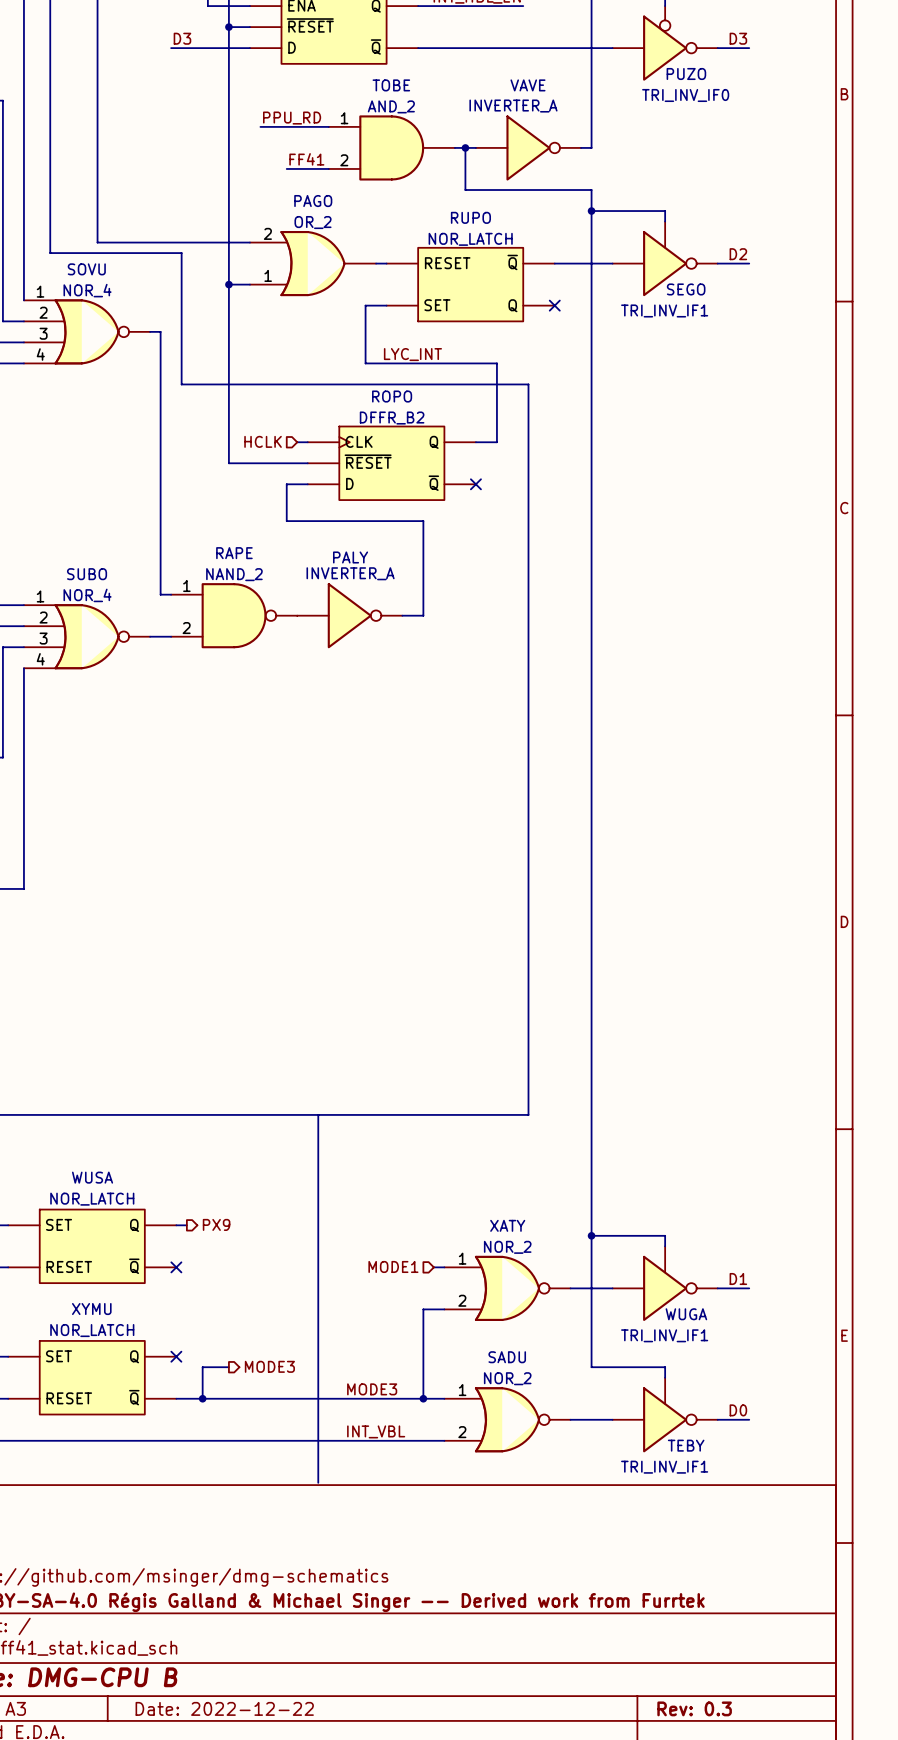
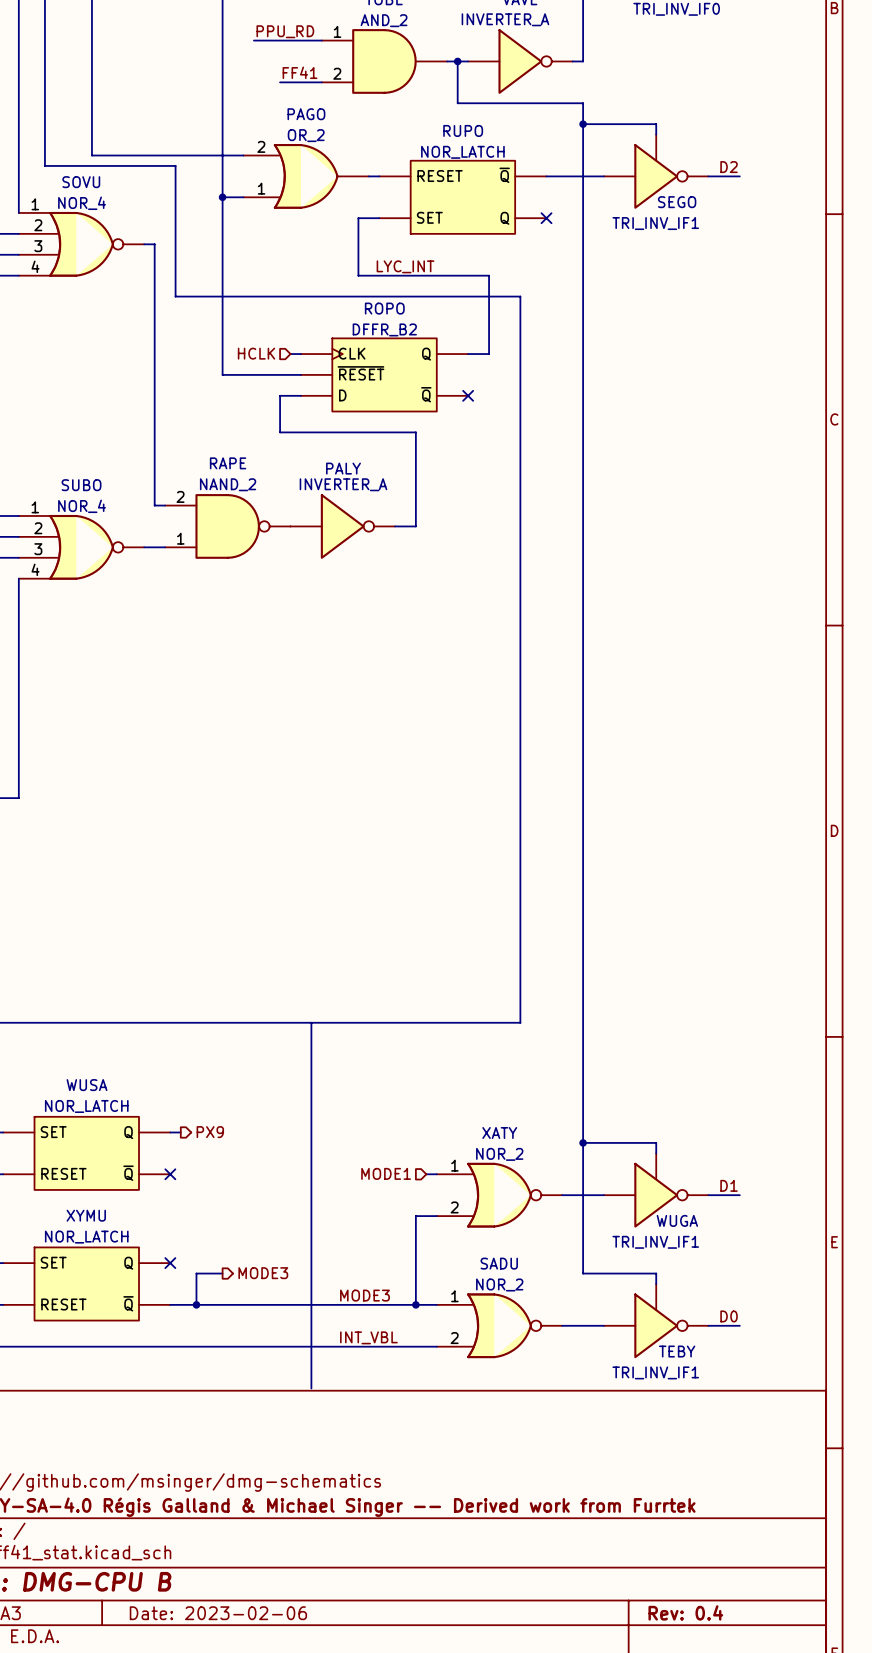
RAPE flip: as is (234, 615) -> up-down (227, 526)
title block: Date: 2022-12-22 (224, 1708) -> Date: 2023-02-06 (218, 1613)
title block: Rev: 0.3 (694, 1708) -> Rev: 0.4 (685, 1612)

